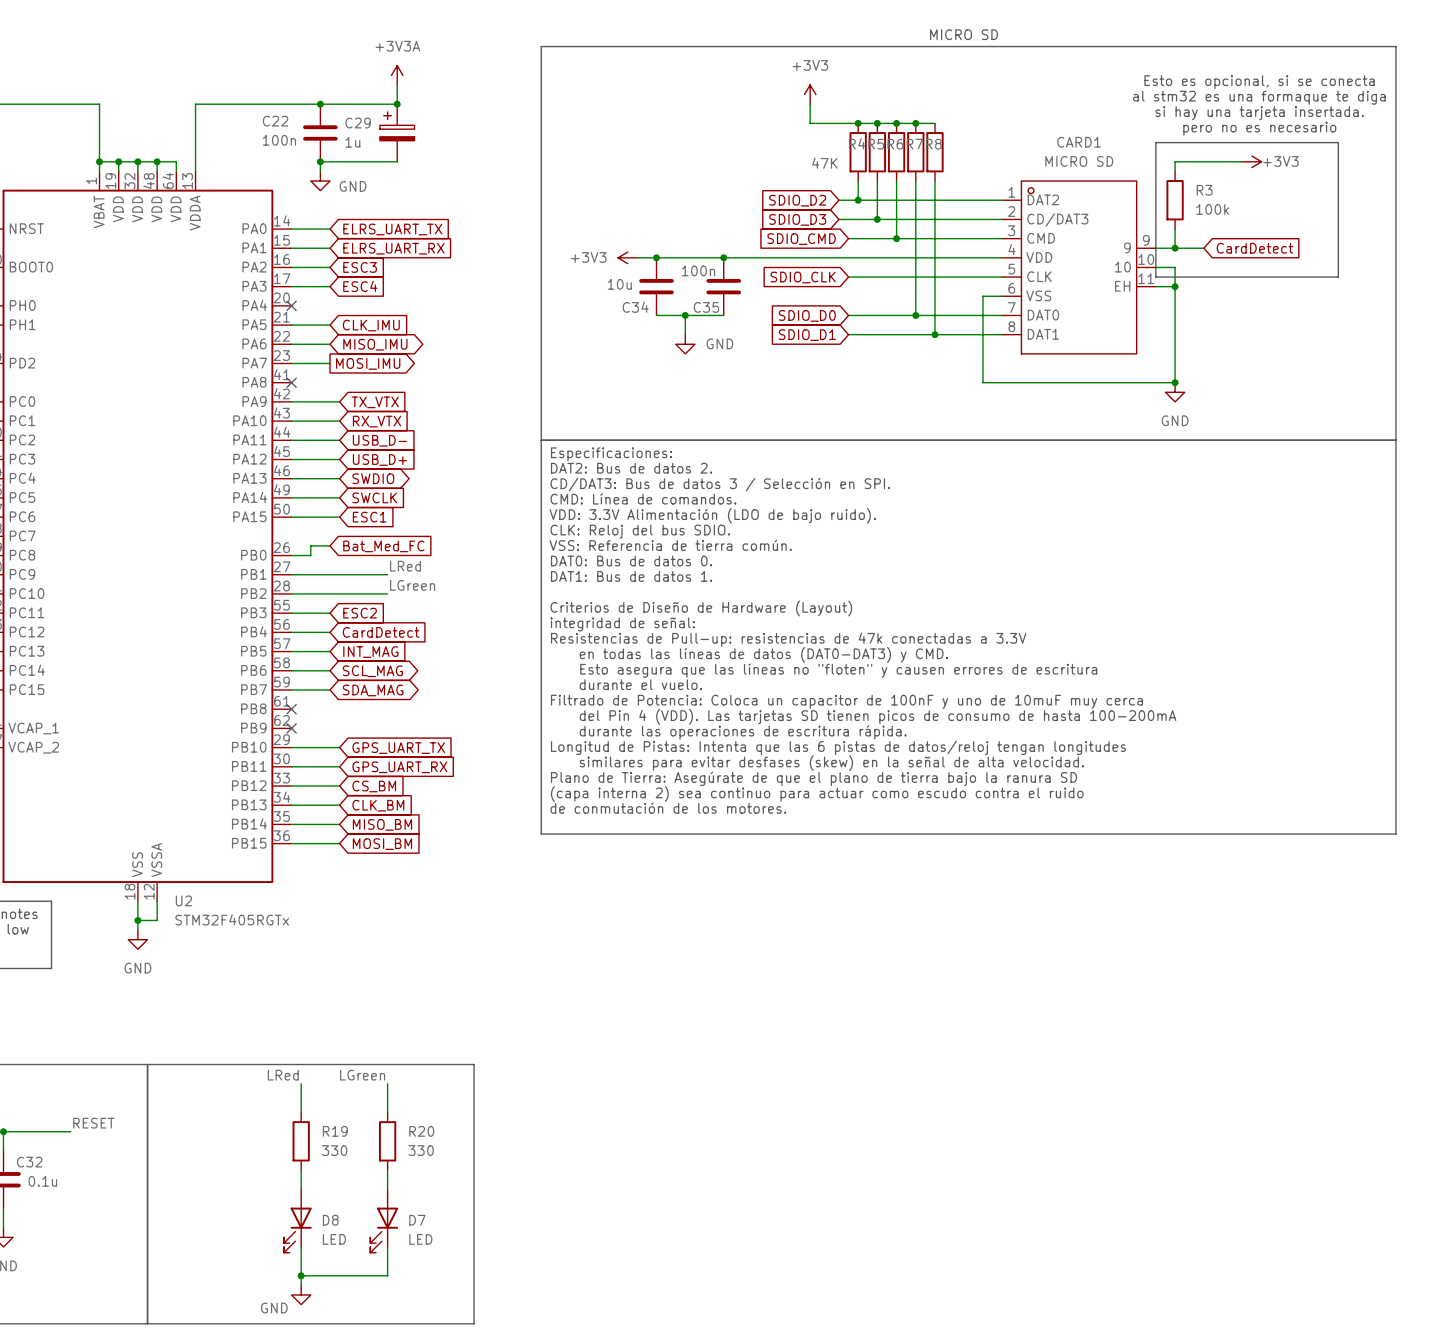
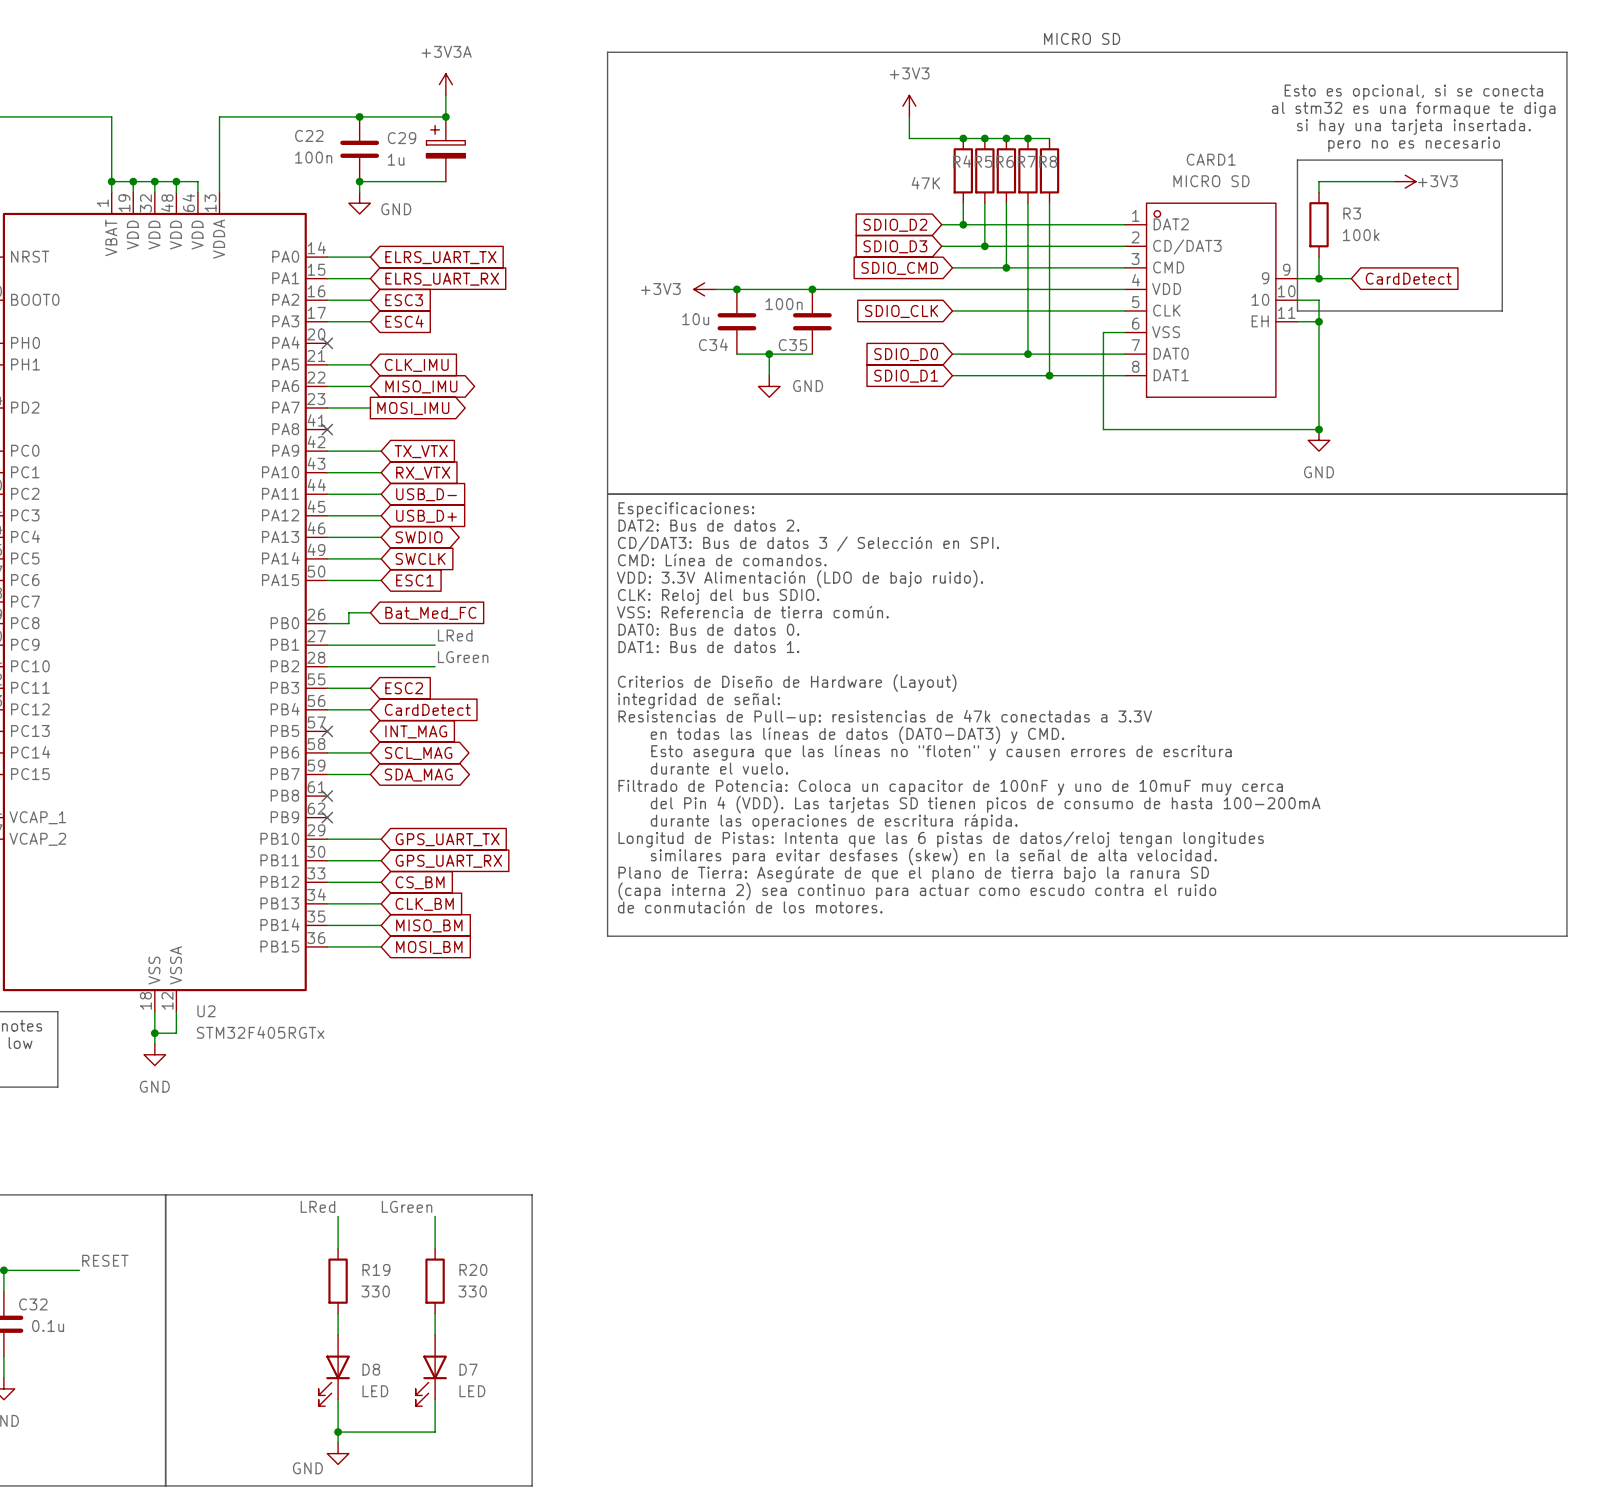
wire: (291, 651) (329, 651) -> none
no-connect mark: none -> (327, 731)

